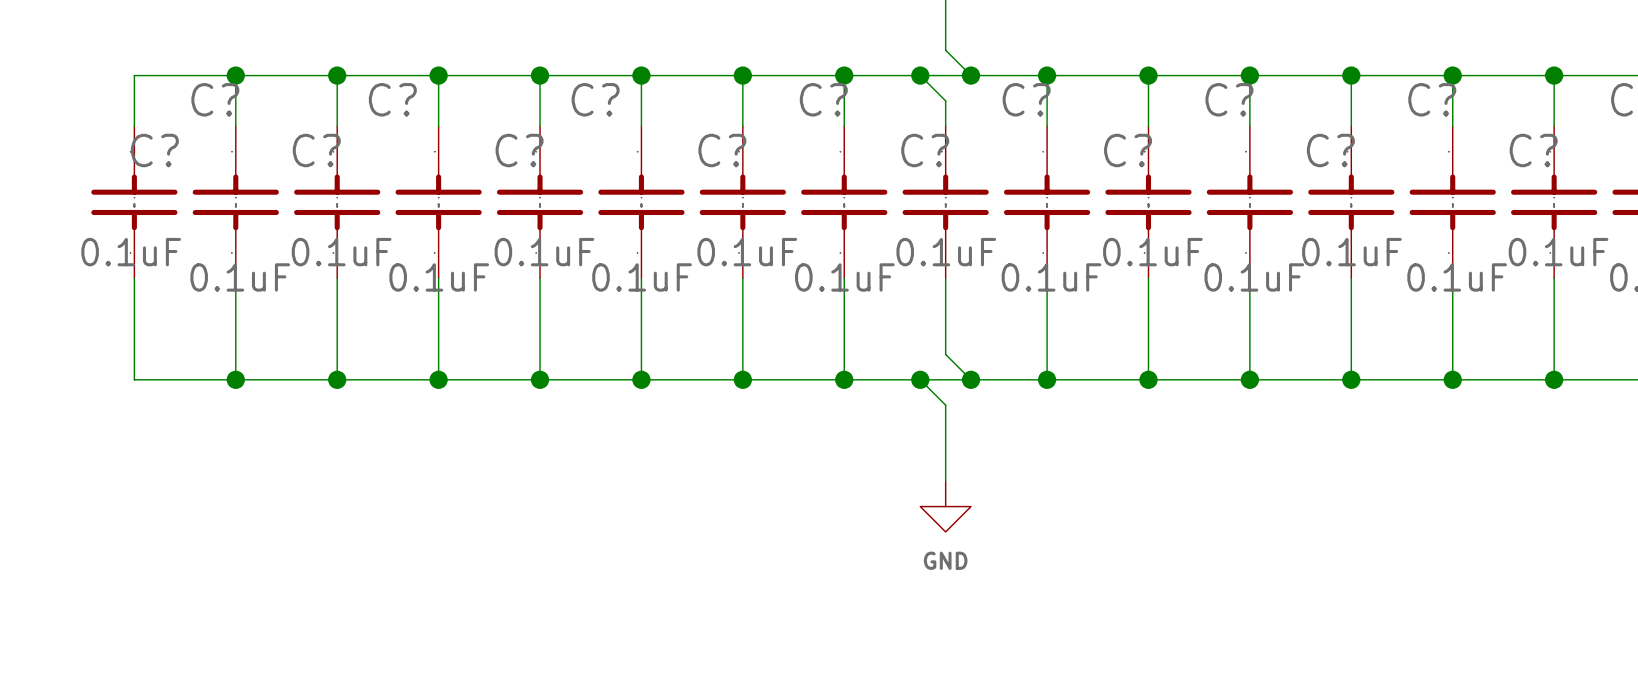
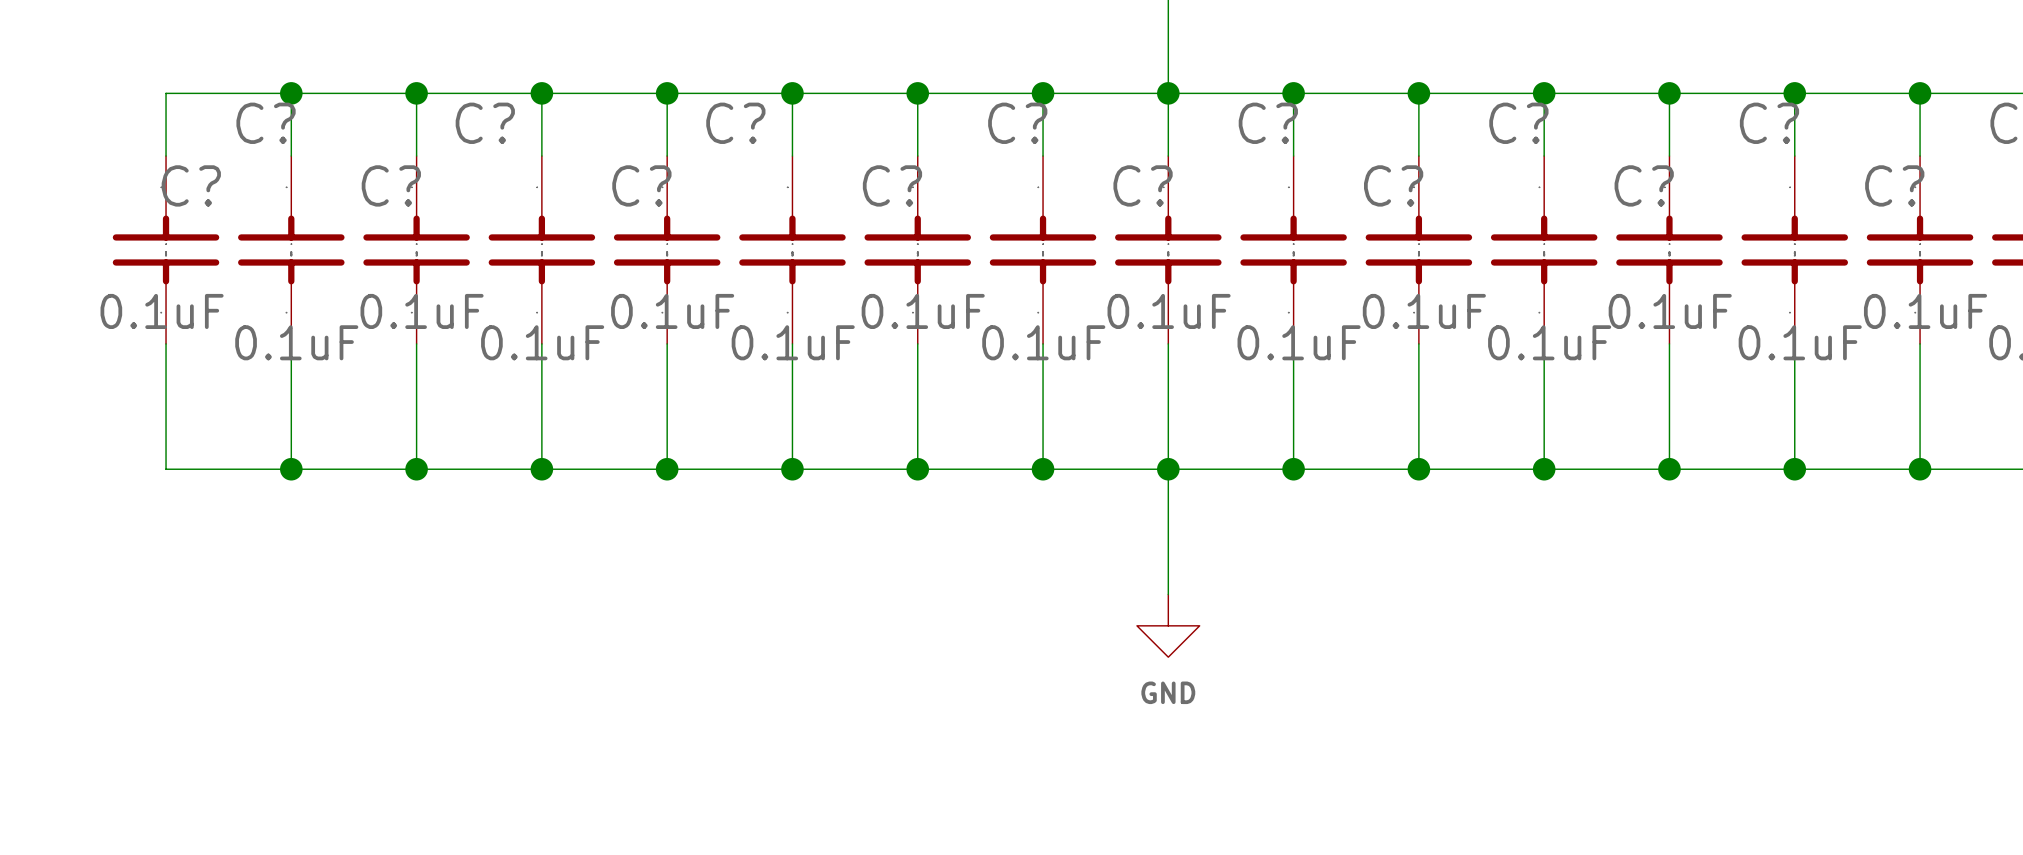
wire: (945, 50) (971, 75) -> (1168, 62) (1168, 124)
wire: (920, 75) (945, 100) -> none
junction: (920, 75) -> none
junction: none -> (1168, 93)
junction: (971, 75) -> none
wire: (945, 354) (971, 379) -> (1168, 437) (1168, 500)
wire: (920, 379) (945, 405) -> none
junction: (920, 379) -> none
junction: none -> (1168, 469)
junction: (971, 379) -> none

